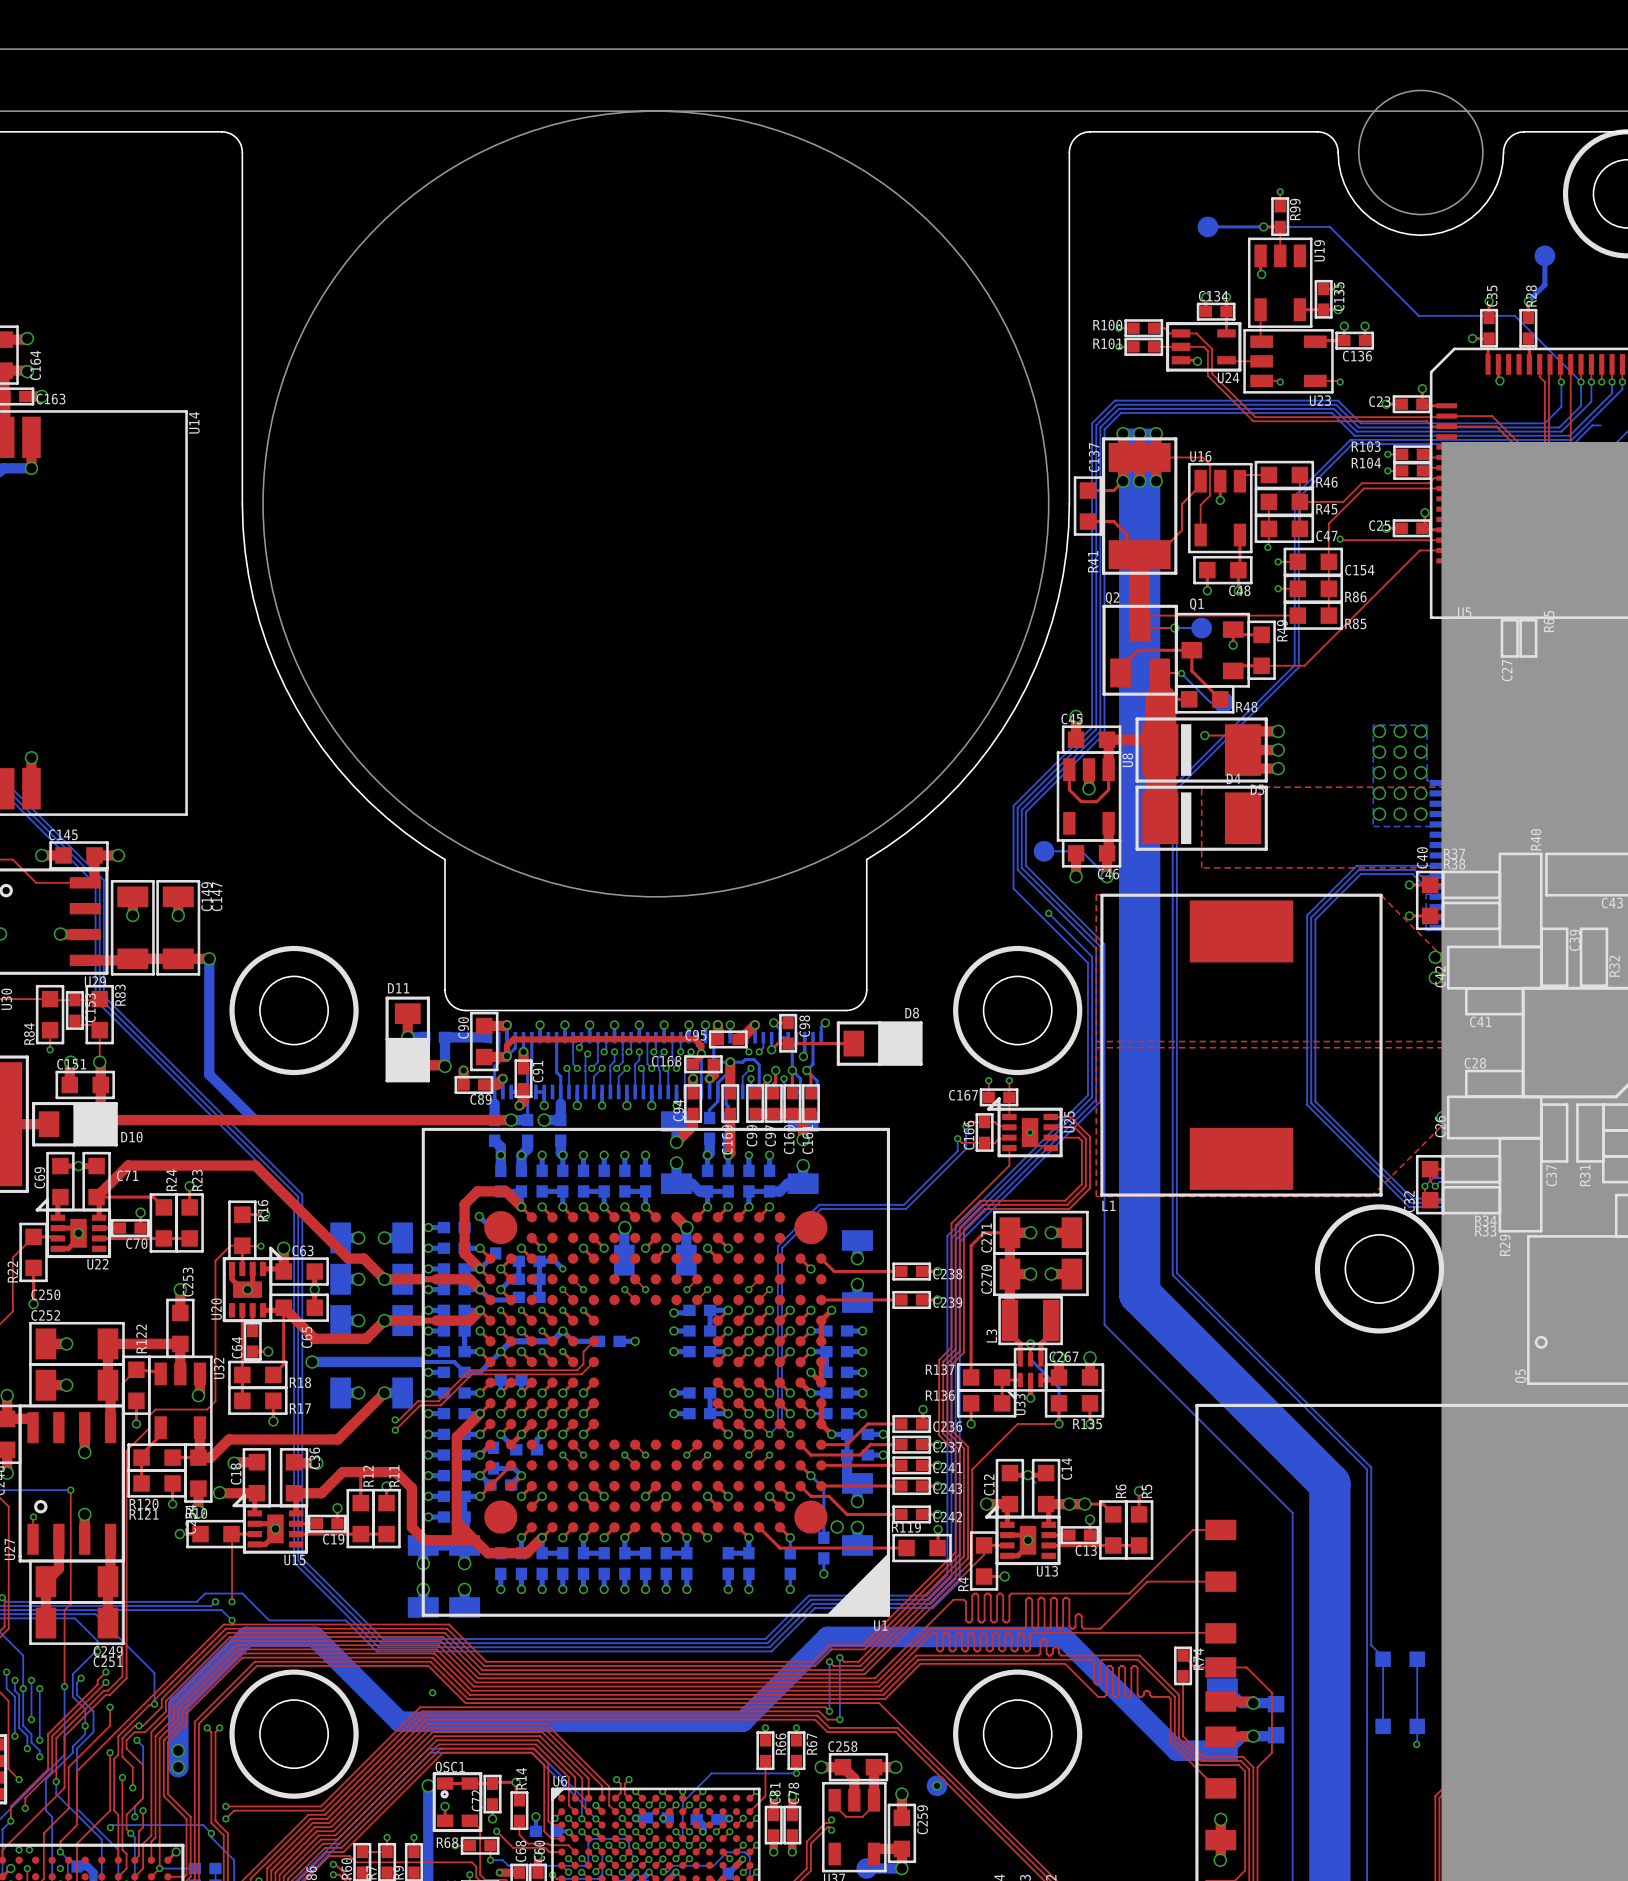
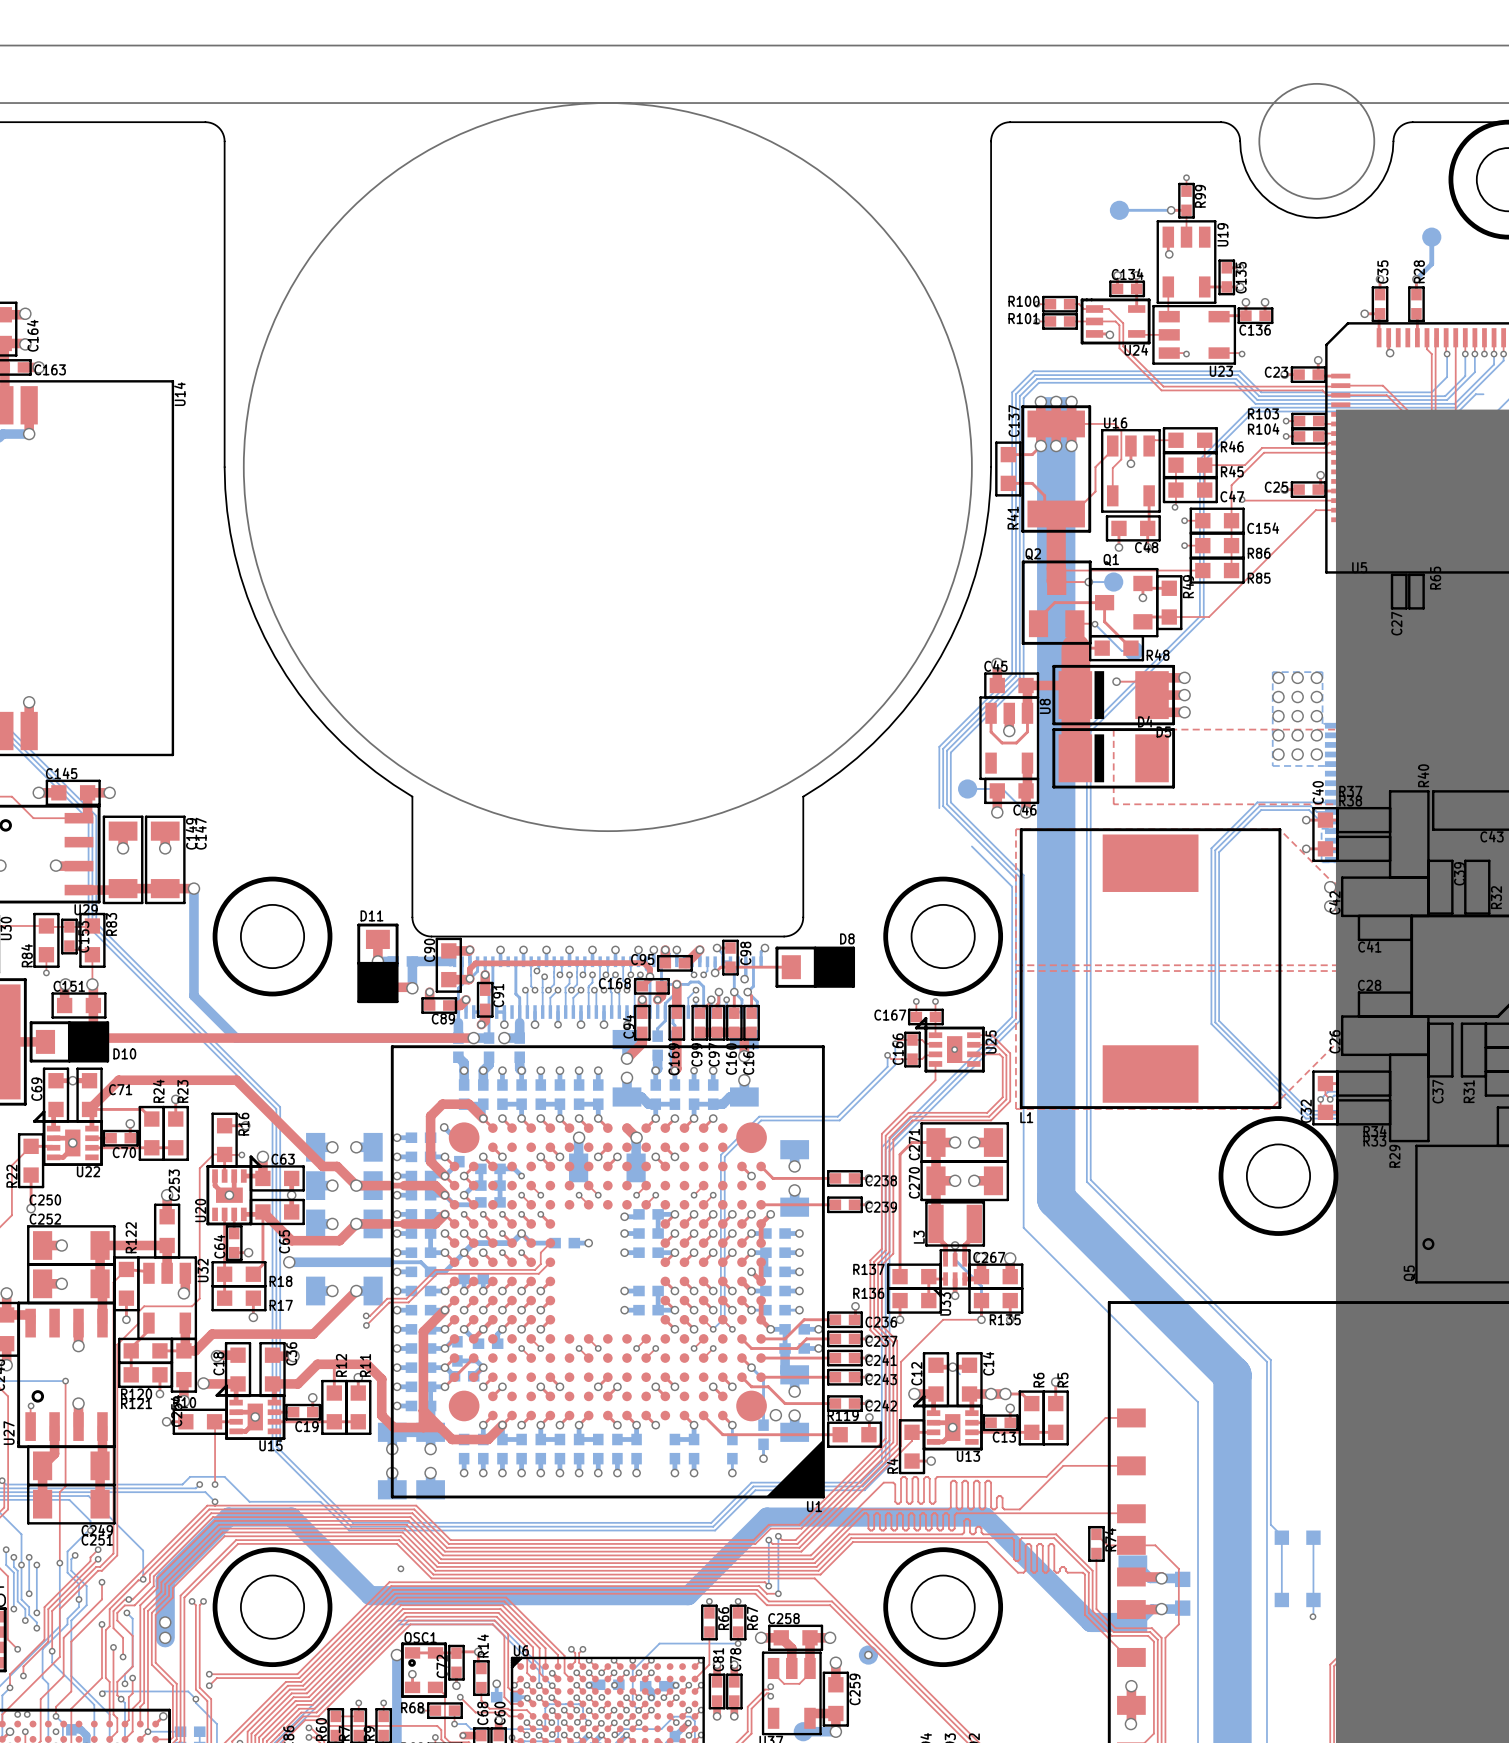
bottom track: (1263, 226) (1329, 226) (1418, 315) (1514, 315) (1581, 381) -> none
bottom track: (1013, 871) (1013, 888) (1087, 962) (1087, 1095) (947, 1235) (947, 1574) (926, 1595) (808, 1595) (765, 1639) (382, 1639) (302, 1558) -> none
via: (1048, 913) -> none

